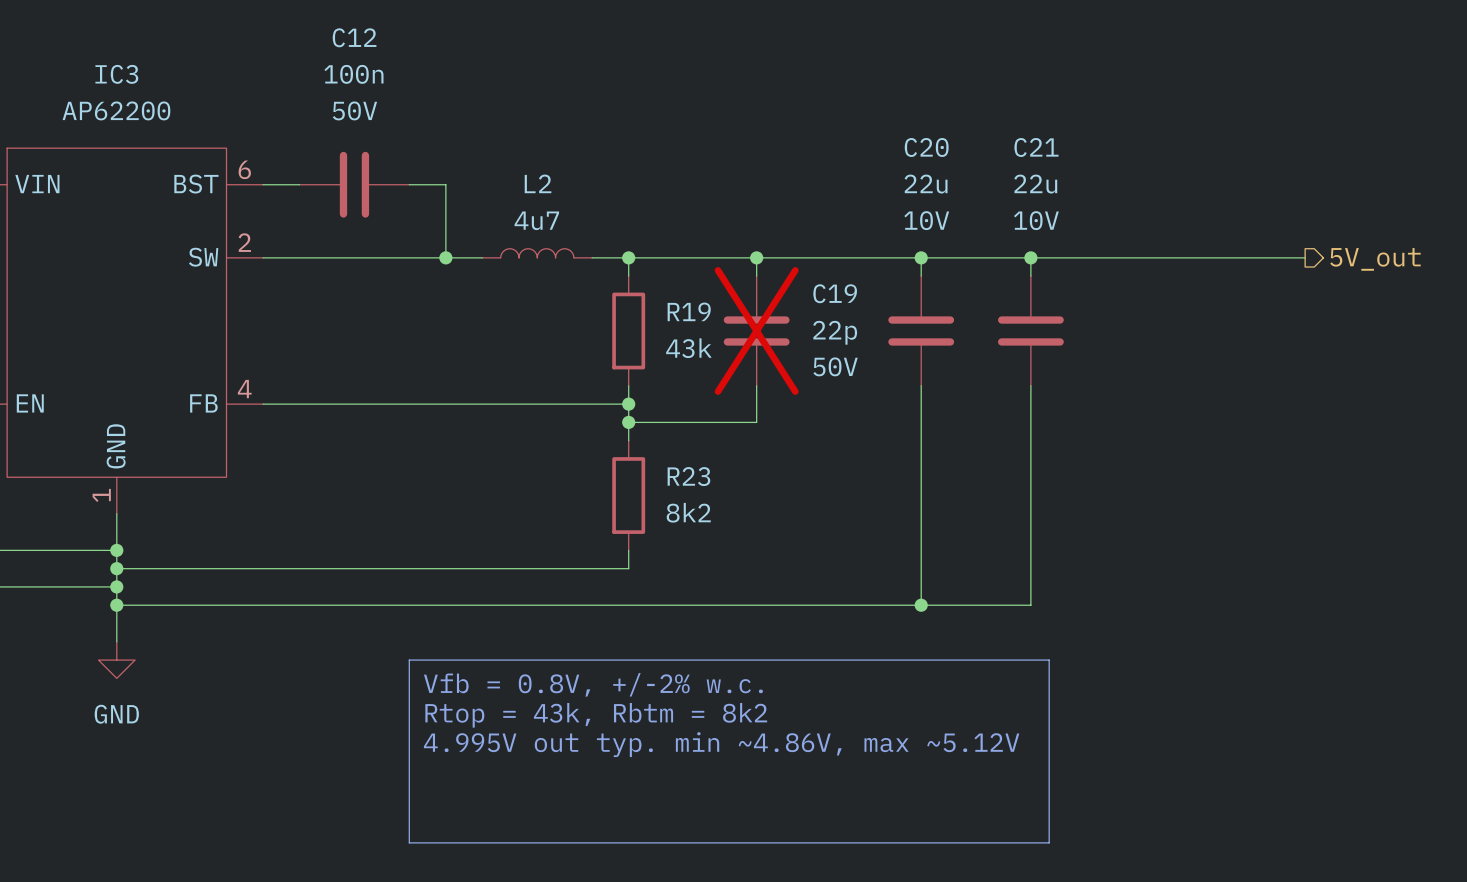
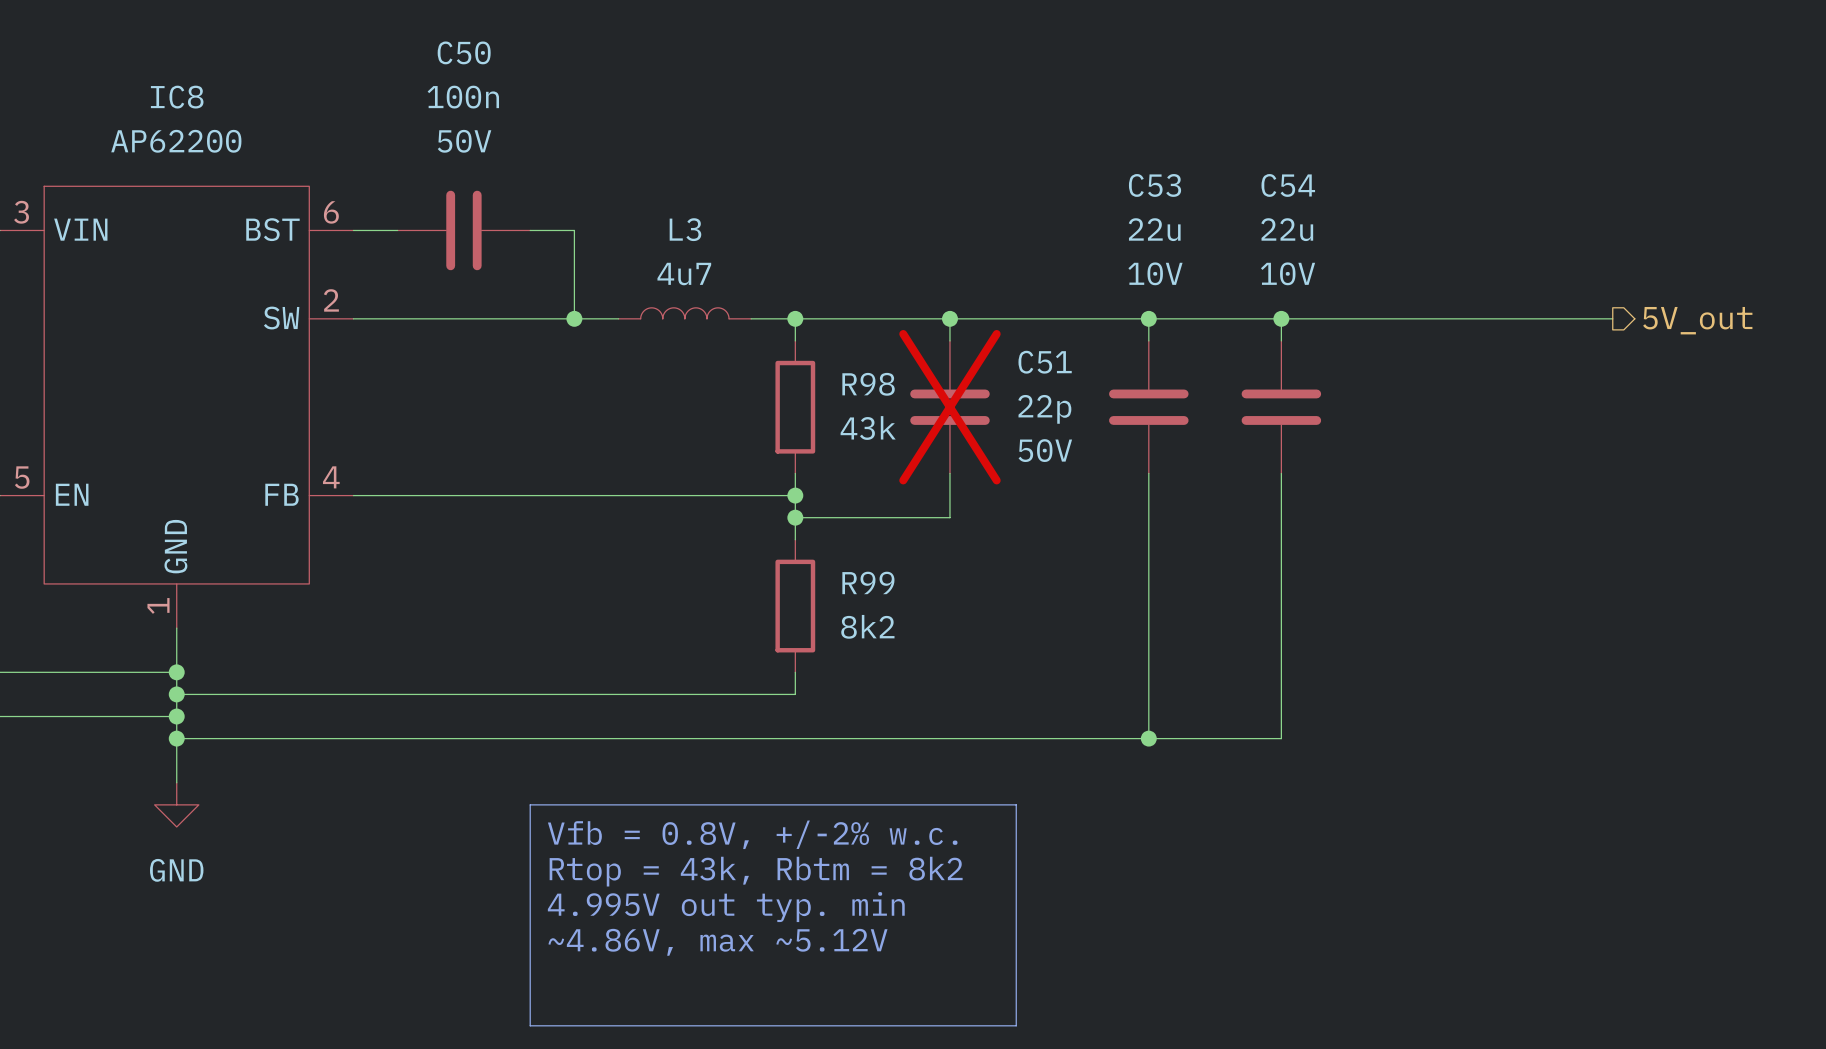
C12 name: C12 (354, 37) -> C50 (464, 52)
IC3 name: IC3 (116, 74) -> IC8 (177, 97)
C20 name: C20 (926, 147) -> C53 (1155, 185)
C21 name: C21 (1036, 147) -> C54 (1288, 185)
L2 name: L2 (538, 183) -> L3 (685, 229)
C19 name: C19 (835, 293) -> C51 (1045, 362)
R19 name: R19 (689, 311) -> R98 (868, 384)
R23 name: R23 (688, 476) -> R99 (868, 582)
line: (811, 660) (1049, 660) (1049, 842) (811, 842) -> (1016, 804) (1016, 1025)
text: 4.995V out typ. min ~4.86V, max ~5.12V (721, 744) -> 4.995V out typ. min (726, 907)
text: none -> ~4.86V, max ~5.12V (717, 942)

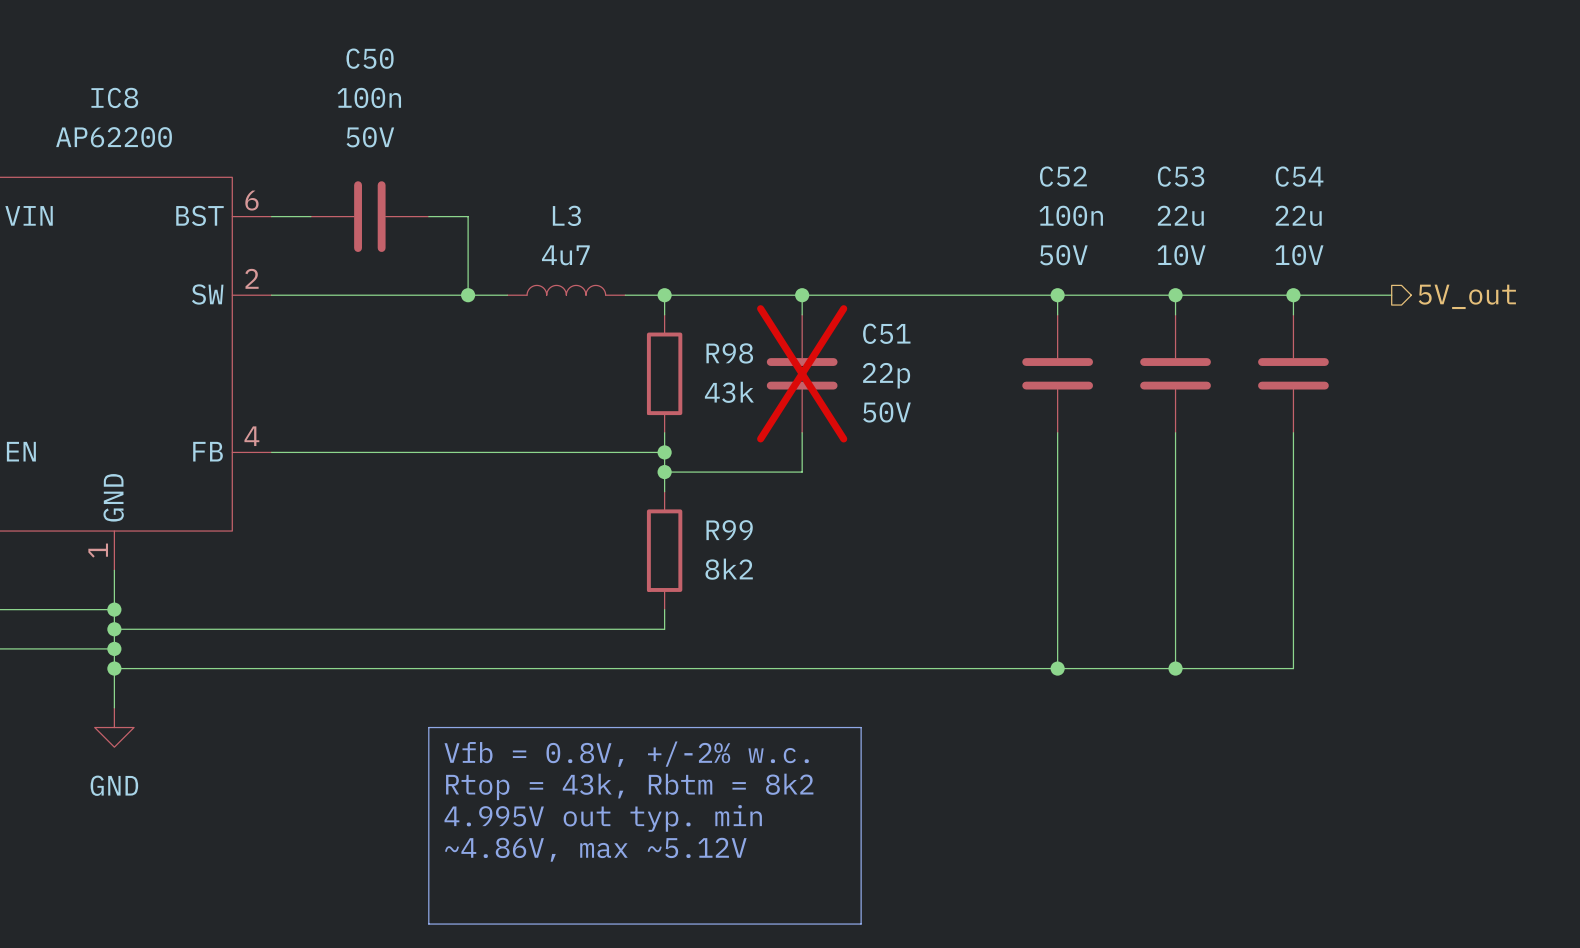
wire: (1148, 318) (1148, 340) -> (1057, 295) (1057, 314)
junction: (1148, 318) -> none
junction: none -> (1057, 295)
wire: (1281, 318) (1281, 340) -> (1175, 295) (1175, 314)
junction: (1281, 318) -> none
junction: none -> (1175, 295)
wire: none -> (1293, 295) (1293, 314)
junction: none -> (1293, 295)
C53 position: (1148, 407) -> (1175, 373)
C52: none -> 100n (1057, 373)
C54 position: (1281, 407) -> (1293, 373)
wire: (1148, 473) (1148, 738) -> (1057, 432) (1057, 668)
wire: (1281, 473) (1281, 738) -> (1293, 432) (1293, 668) (1096, 668)
wire: none -> (1175, 432) (1175, 668)
junction position: (1148, 738) -> (1057, 668)
junction: none -> (1175, 668)

